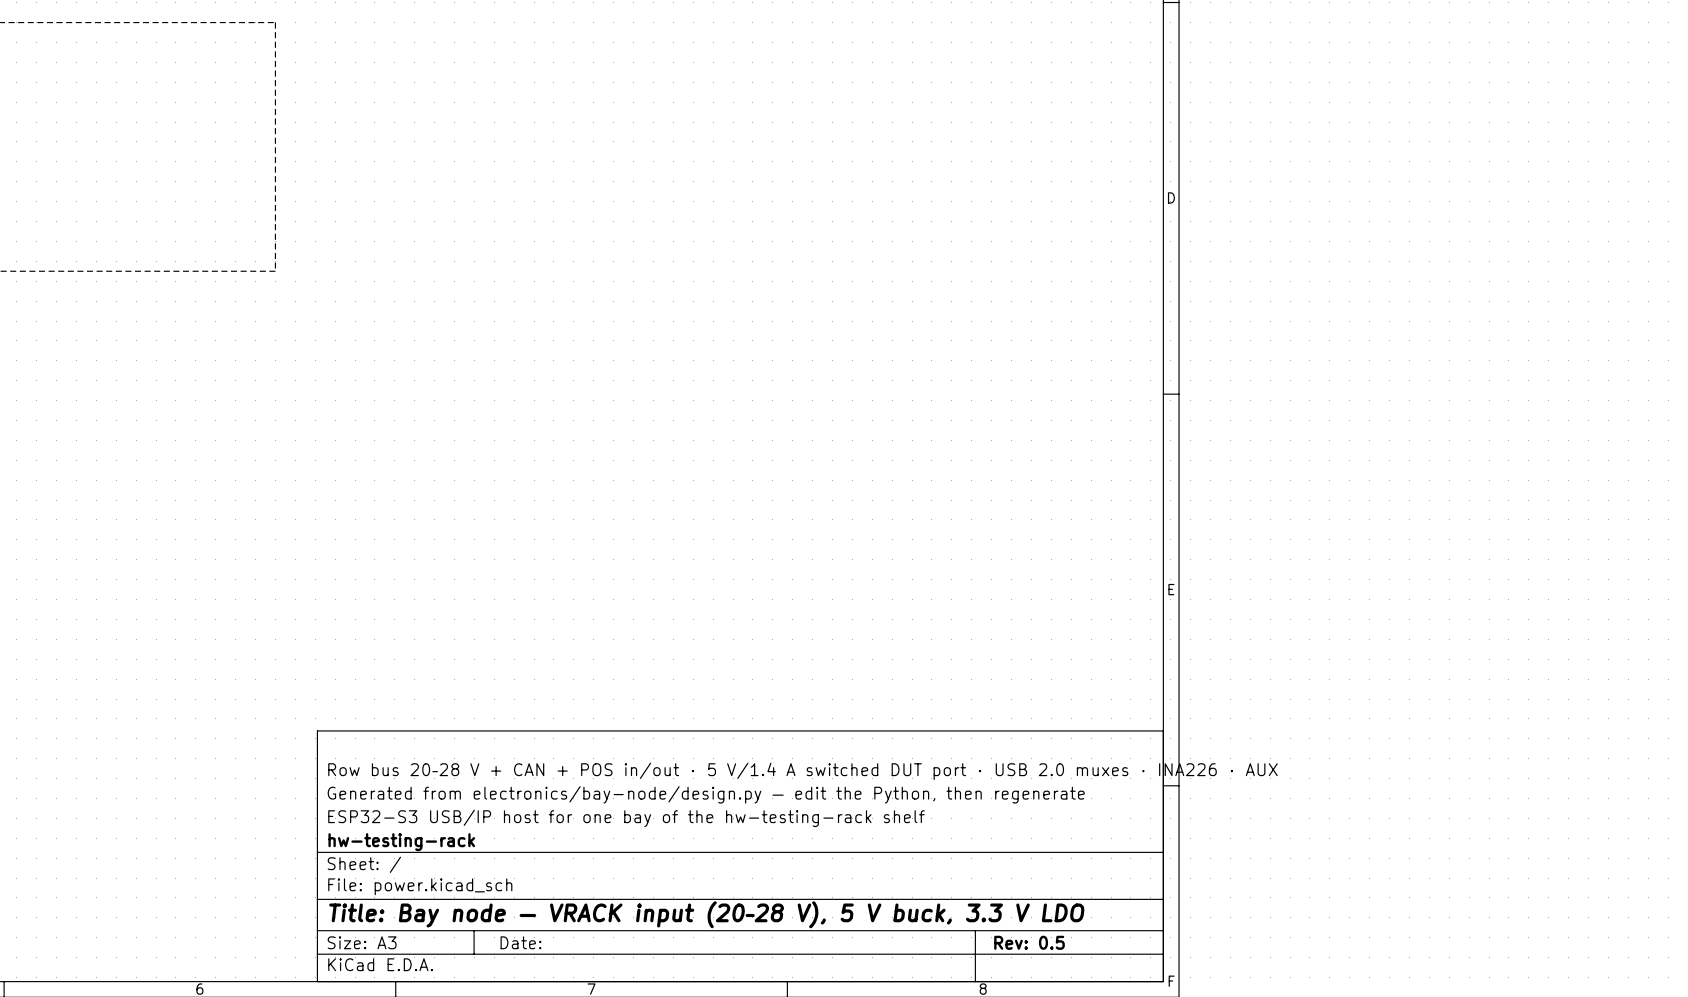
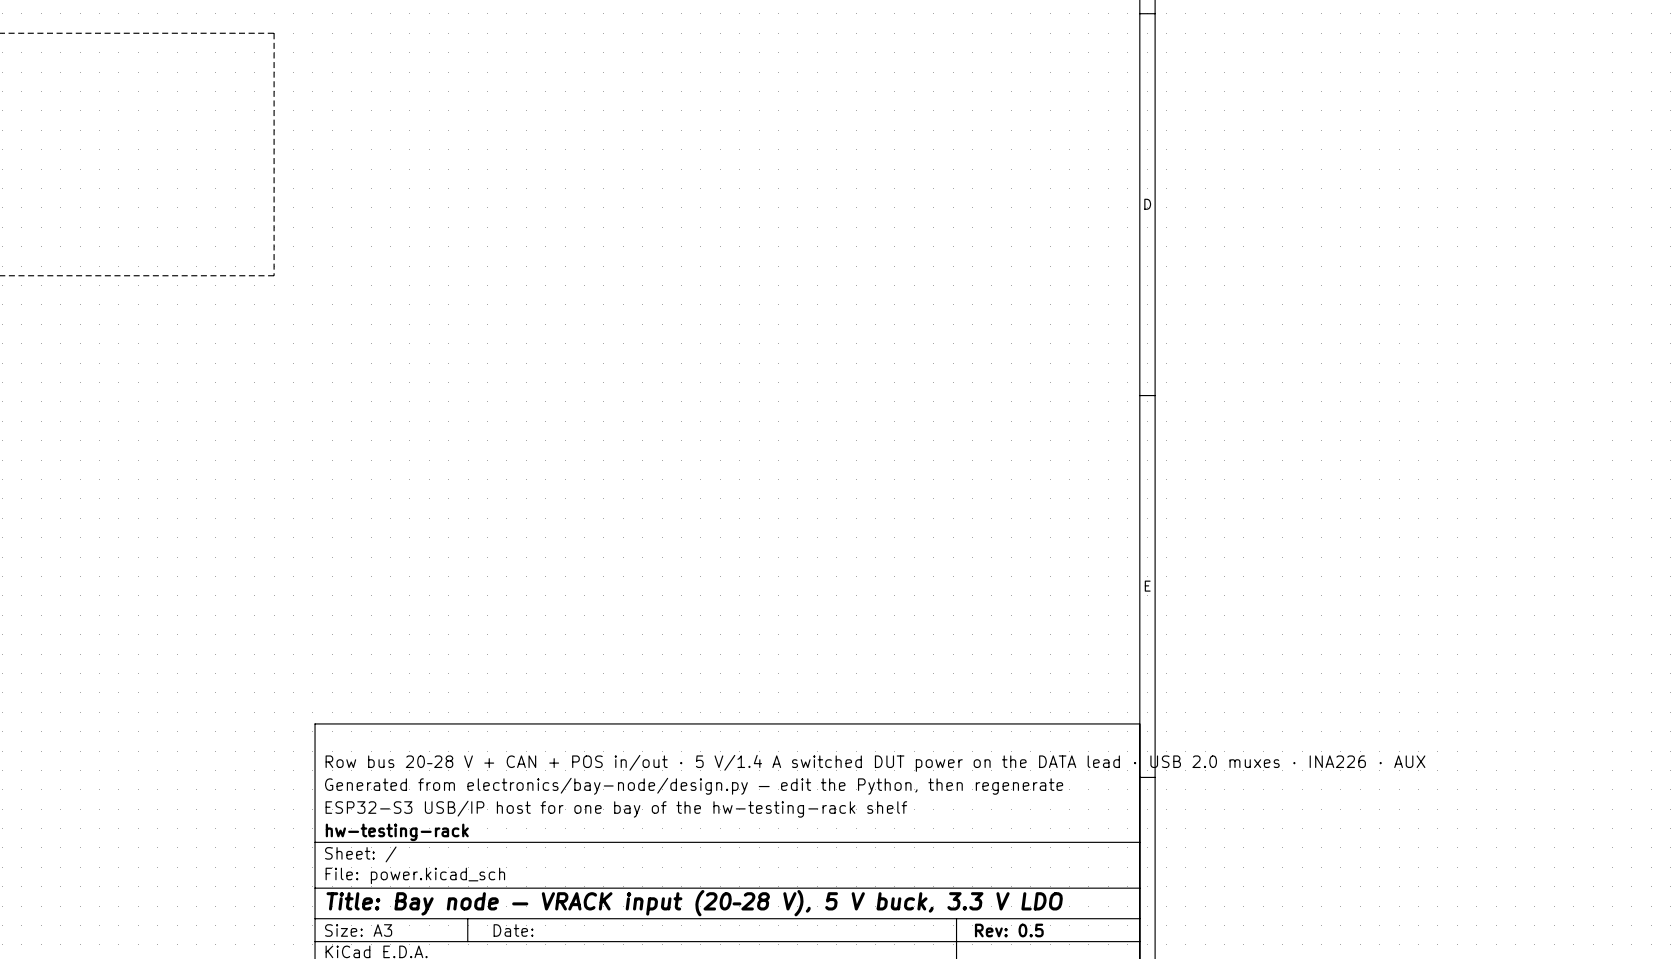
title block: Row bus 20–28 V + CAN + POS in/out · 5 V/1.4 A switched DUT port · USB 2.0 muxes · INA226 · AUX (802, 771) -> Row bus 20–28 V + CAN + POS in/out · 5 V/1.4 A switched DUT power on the DATA lead · USB 2.0 muxes · INA226 · AUX (875, 763)

